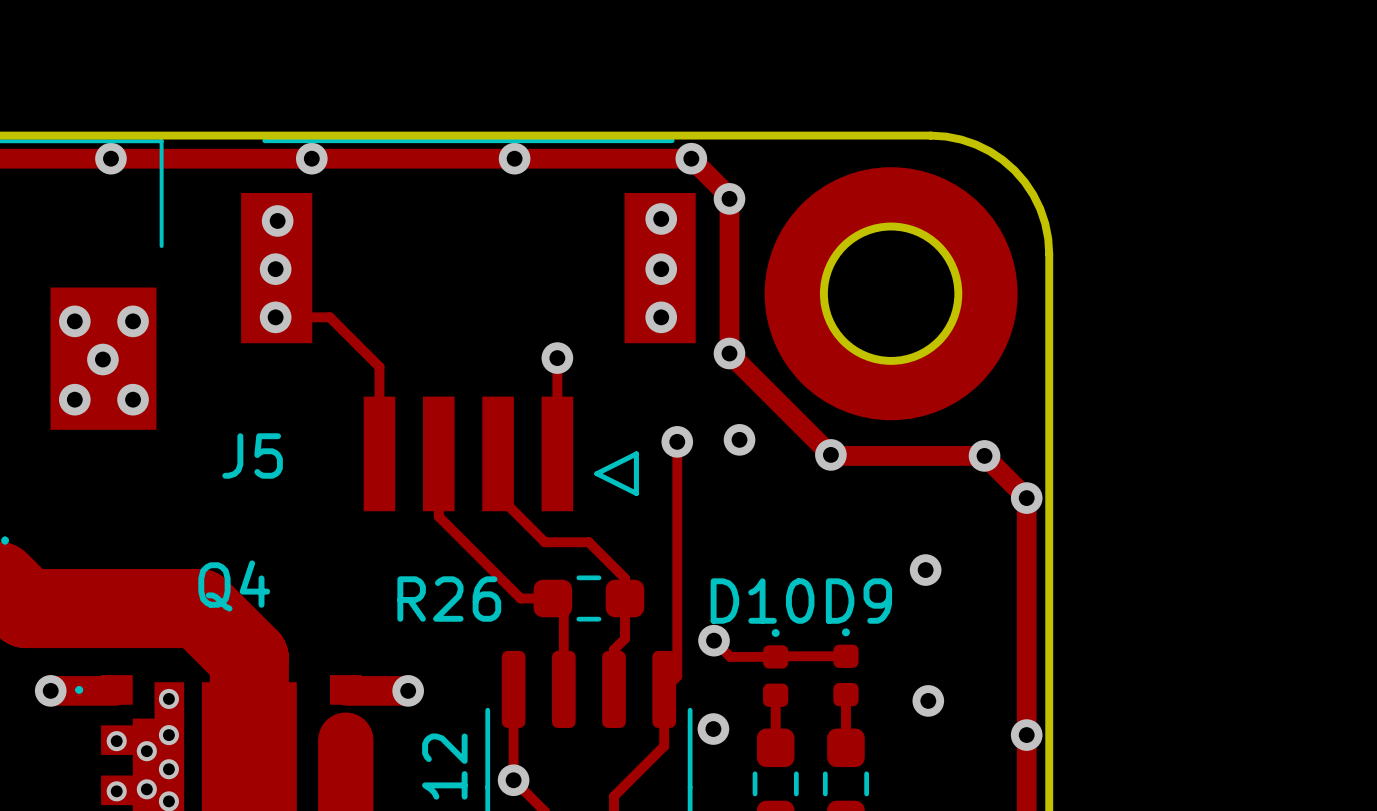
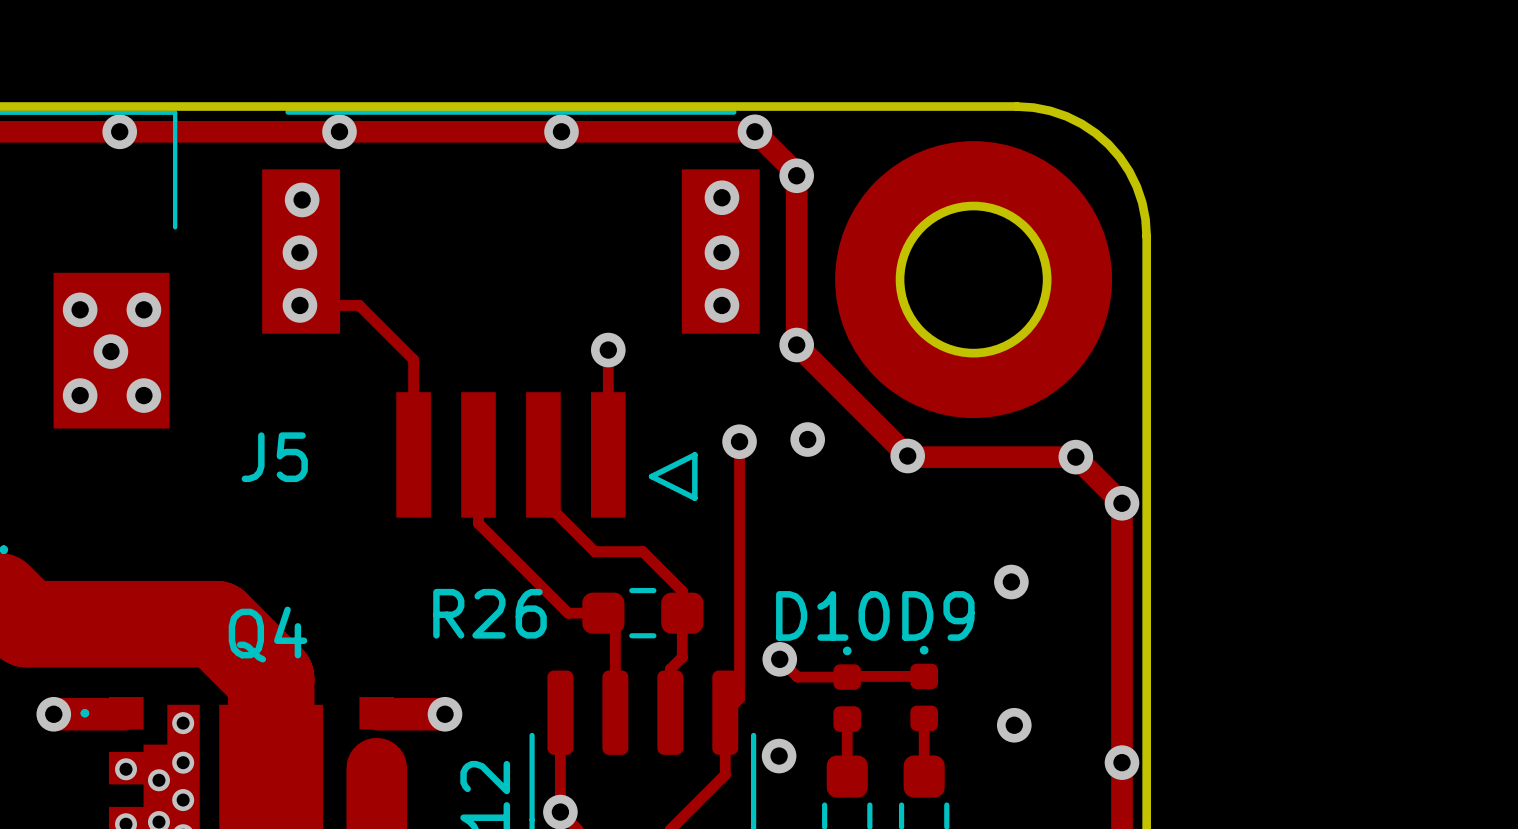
Q4 name position: Q4 (234, 585) -> Q4 (268, 634)

